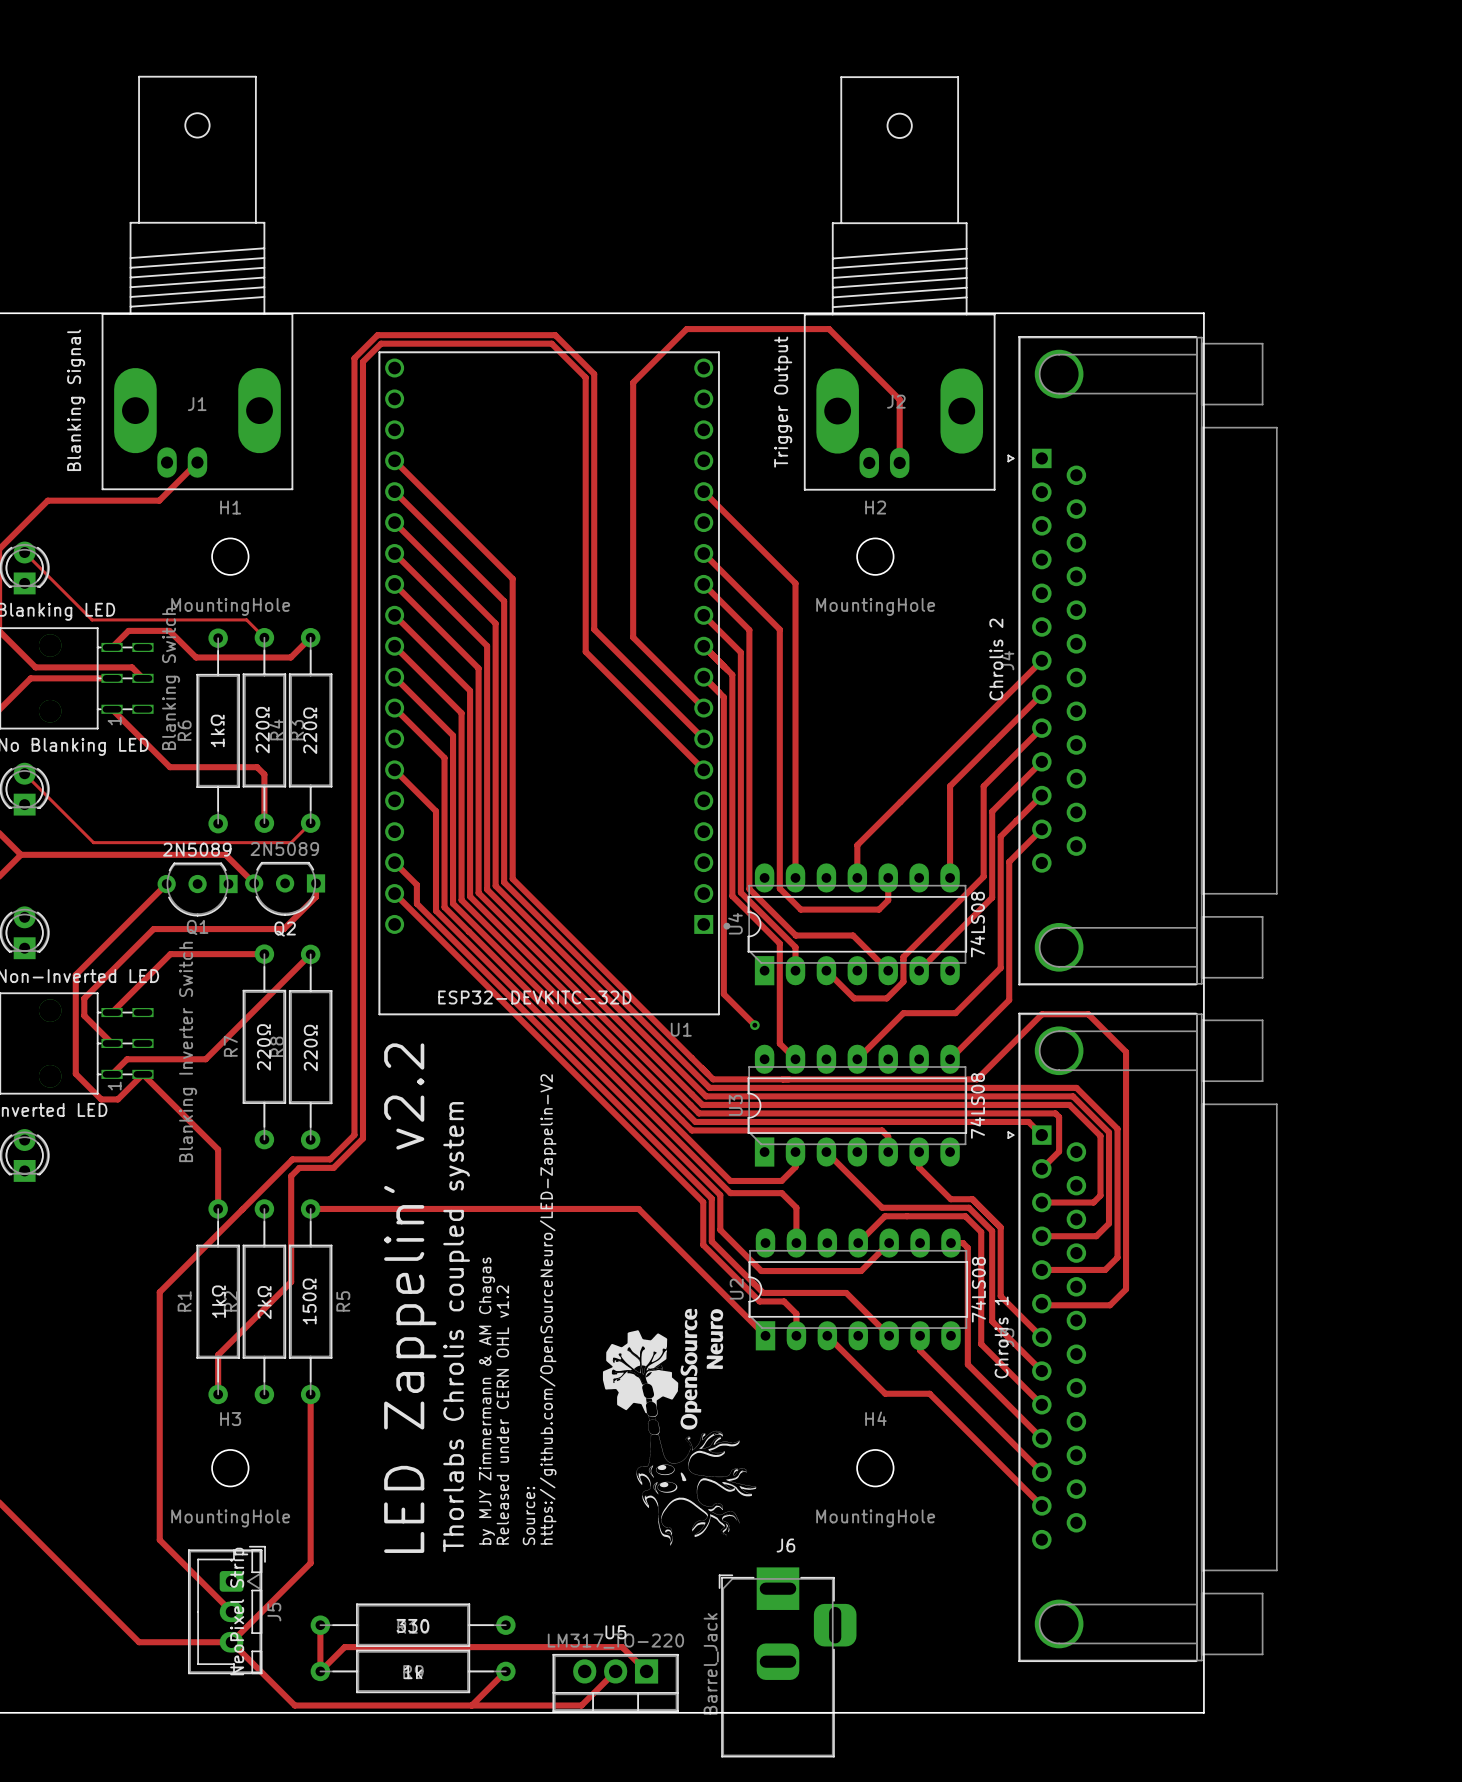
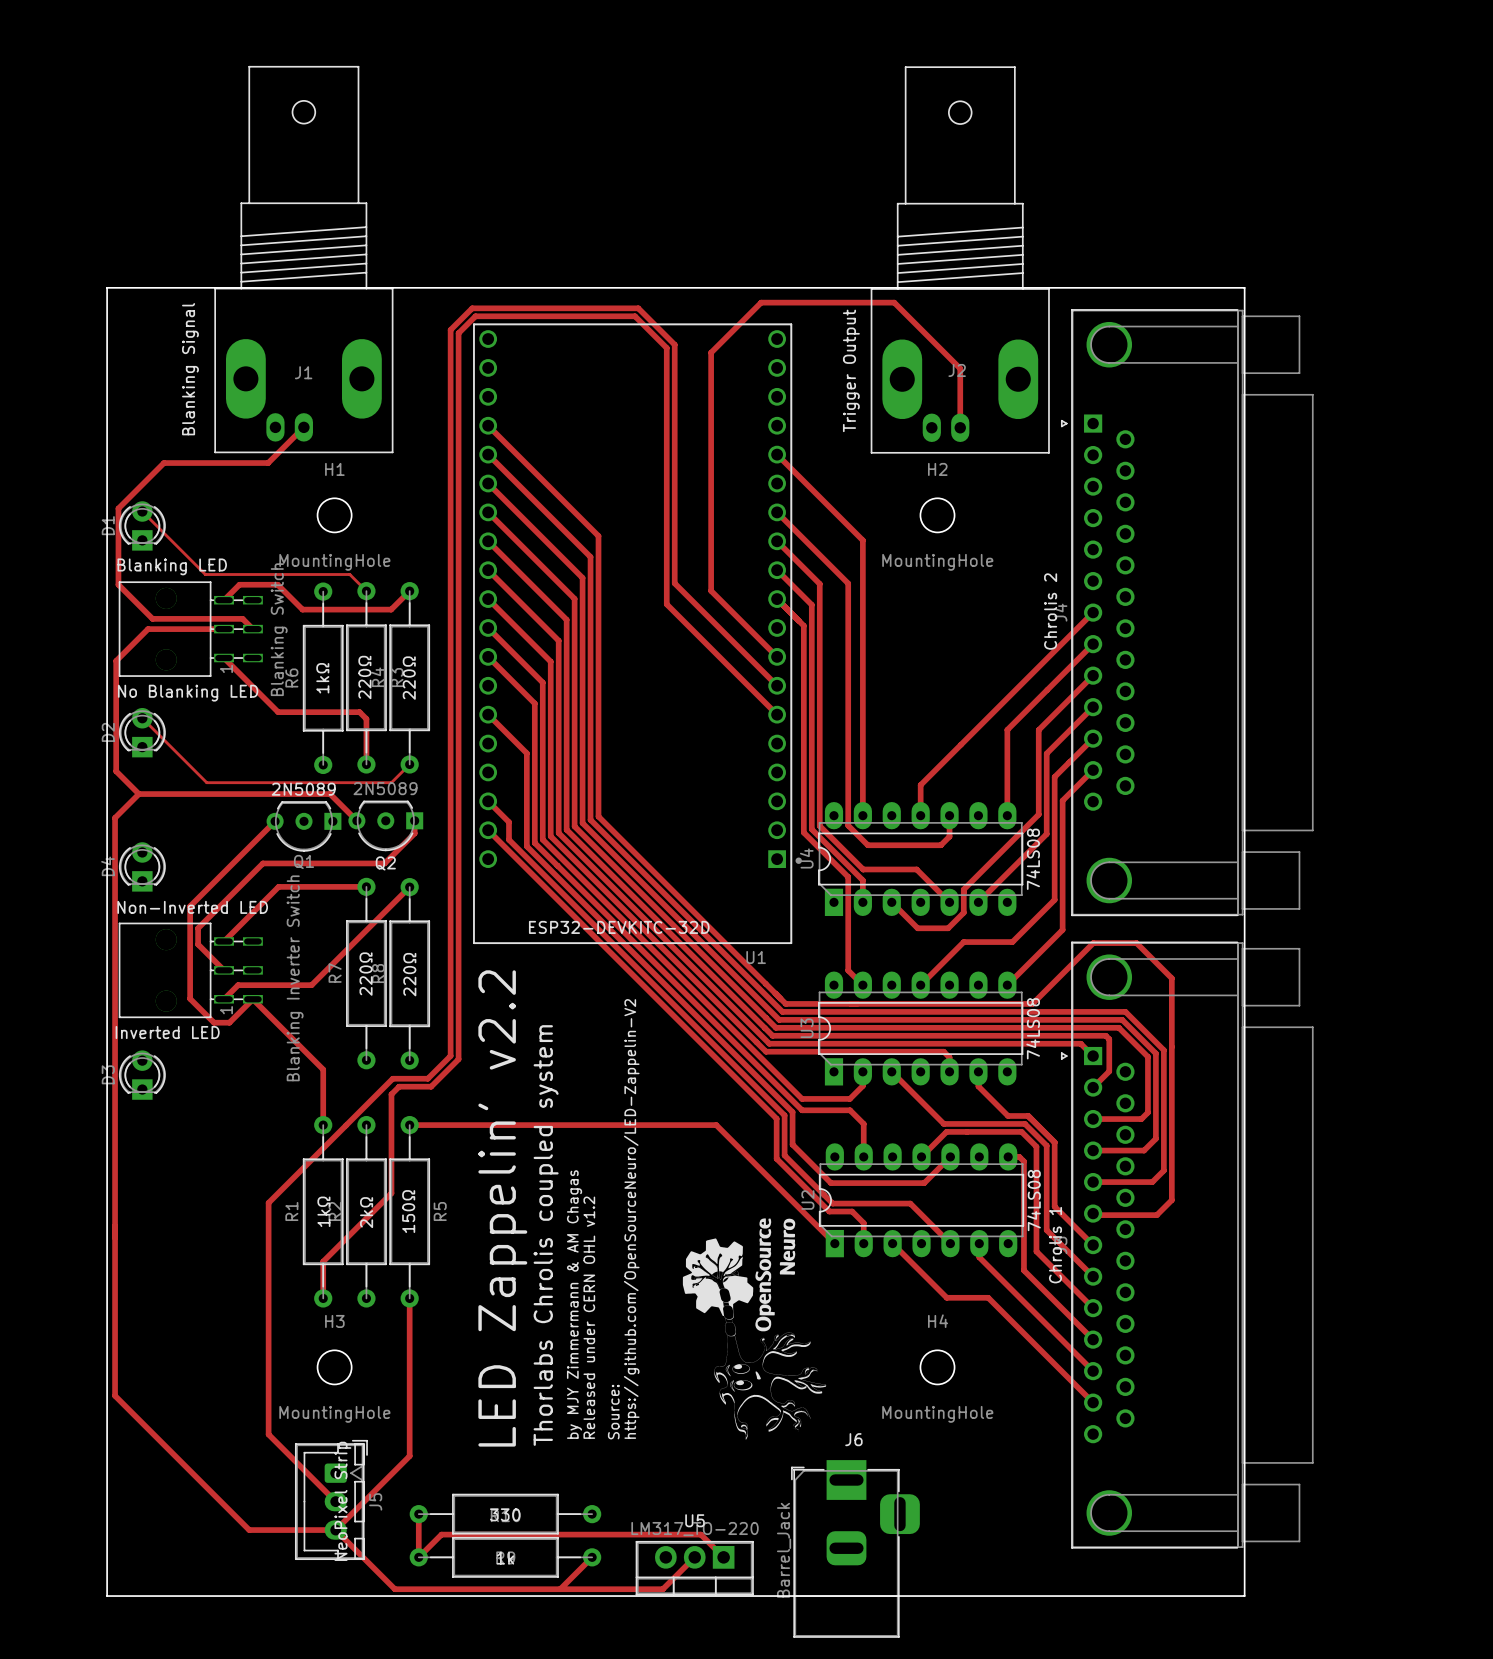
track: (703, 677) (723, 697) (723, 994) (754, 1025) -> none
via: (754, 1025) -> none

